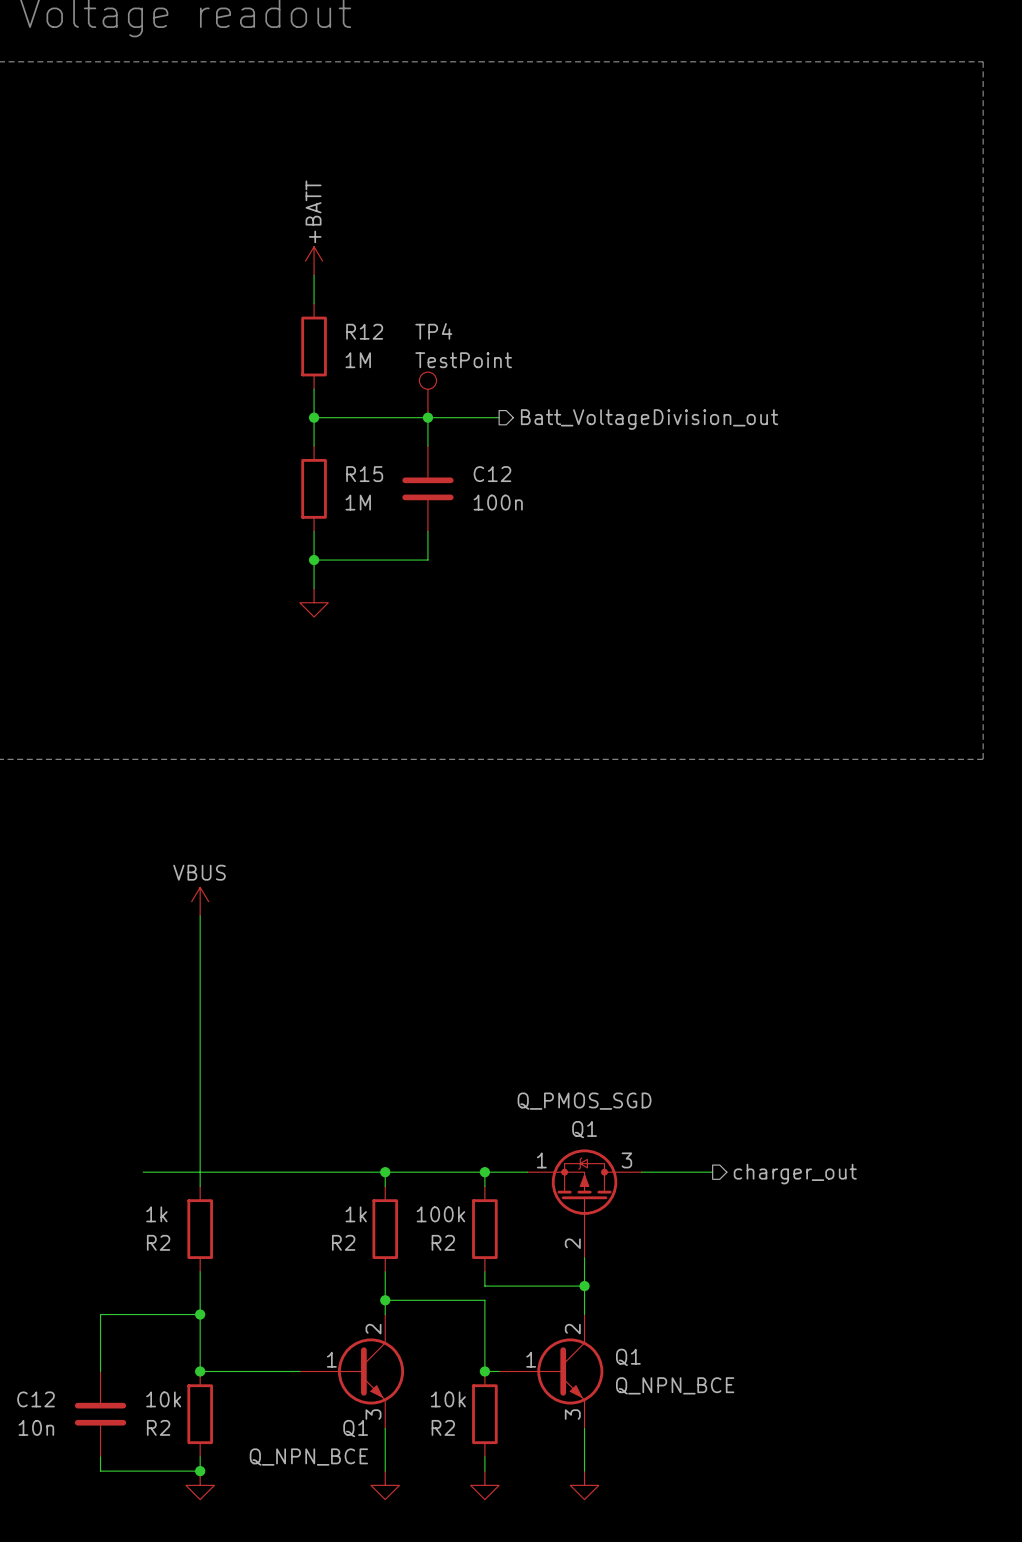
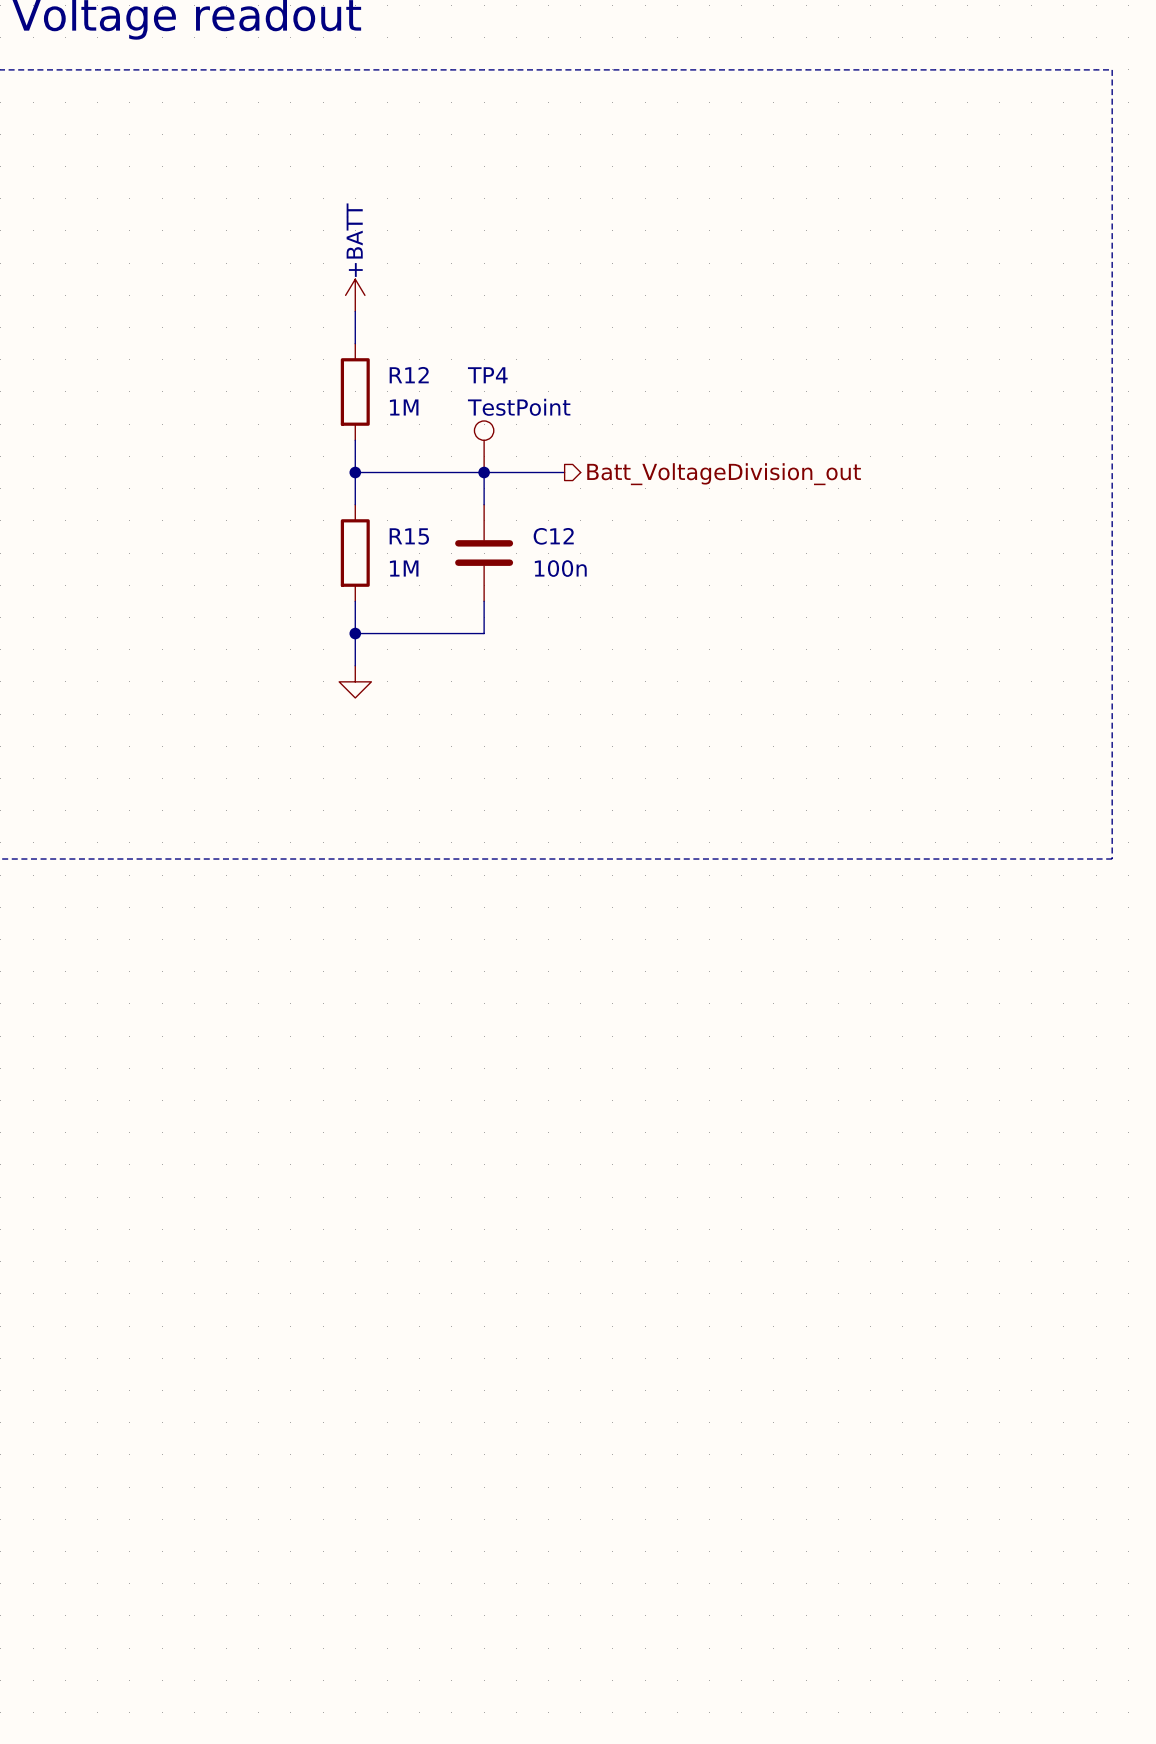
power symbol: VBUS (200, 901) -> none
wire: (200, 915) (200, 1186) -> none
wire: (143, 1172) (527, 1172) -> none
wire: (385, 1172) (385, 1186) -> none
junction: (385, 1172) -> none
wire: (484, 1172) (484, 1186) -> none
junction: (484, 1172) -> none
wire: (641, 1172) (712, 1172) -> none
hierarchical label: charger_out (795, 1174) -> none
Q1: Q_PMOS_SGD (584, 1203) -> none
R2: 1k (200, 1229) -> none
R2: 1k (385, 1229) -> none
R2: 100k (484, 1229) -> none
wire: (584, 1257) (584, 1314) -> none
wire: (200, 1271) (200, 1371) (299, 1371) -> none
wire: (385, 1271) (385, 1314) -> none
wire: (484, 1271) (484, 1286) (584, 1286) -> none
junction: (584, 1286) -> none
wire: (385, 1300) (484, 1300) (484, 1371) (499, 1371) -> none
junction: (385, 1300) -> none
wire: (200, 1314) (100, 1314) (100, 1371) -> none
junction: (200, 1314) -> none
junction: (200, 1371) -> none
Q1: Q_NPN_BCE (351, 1371) -> none
junction: (484, 1371) -> none
Q1: Q_NPN_BCE (551, 1371) -> none
C12: 10n (100, 1414) -> none
R2: 10k (200, 1414) -> none
R2: 10k (484, 1414) -> none
wire: (385, 1428) (385, 1471) -> none
wire: (584, 1428) (584, 1471) -> none
wire: (100, 1456) (100, 1471) (200, 1471) (200, 1456) -> none
wire: (484, 1456) (484, 1471) -> none
junction: (200, 1471) -> none
power symbol: (200, 1485) -> none
power symbol: (385, 1485) -> none
power symbol: (484, 1485) -> none
power symbol: (584, 1485) -> none

